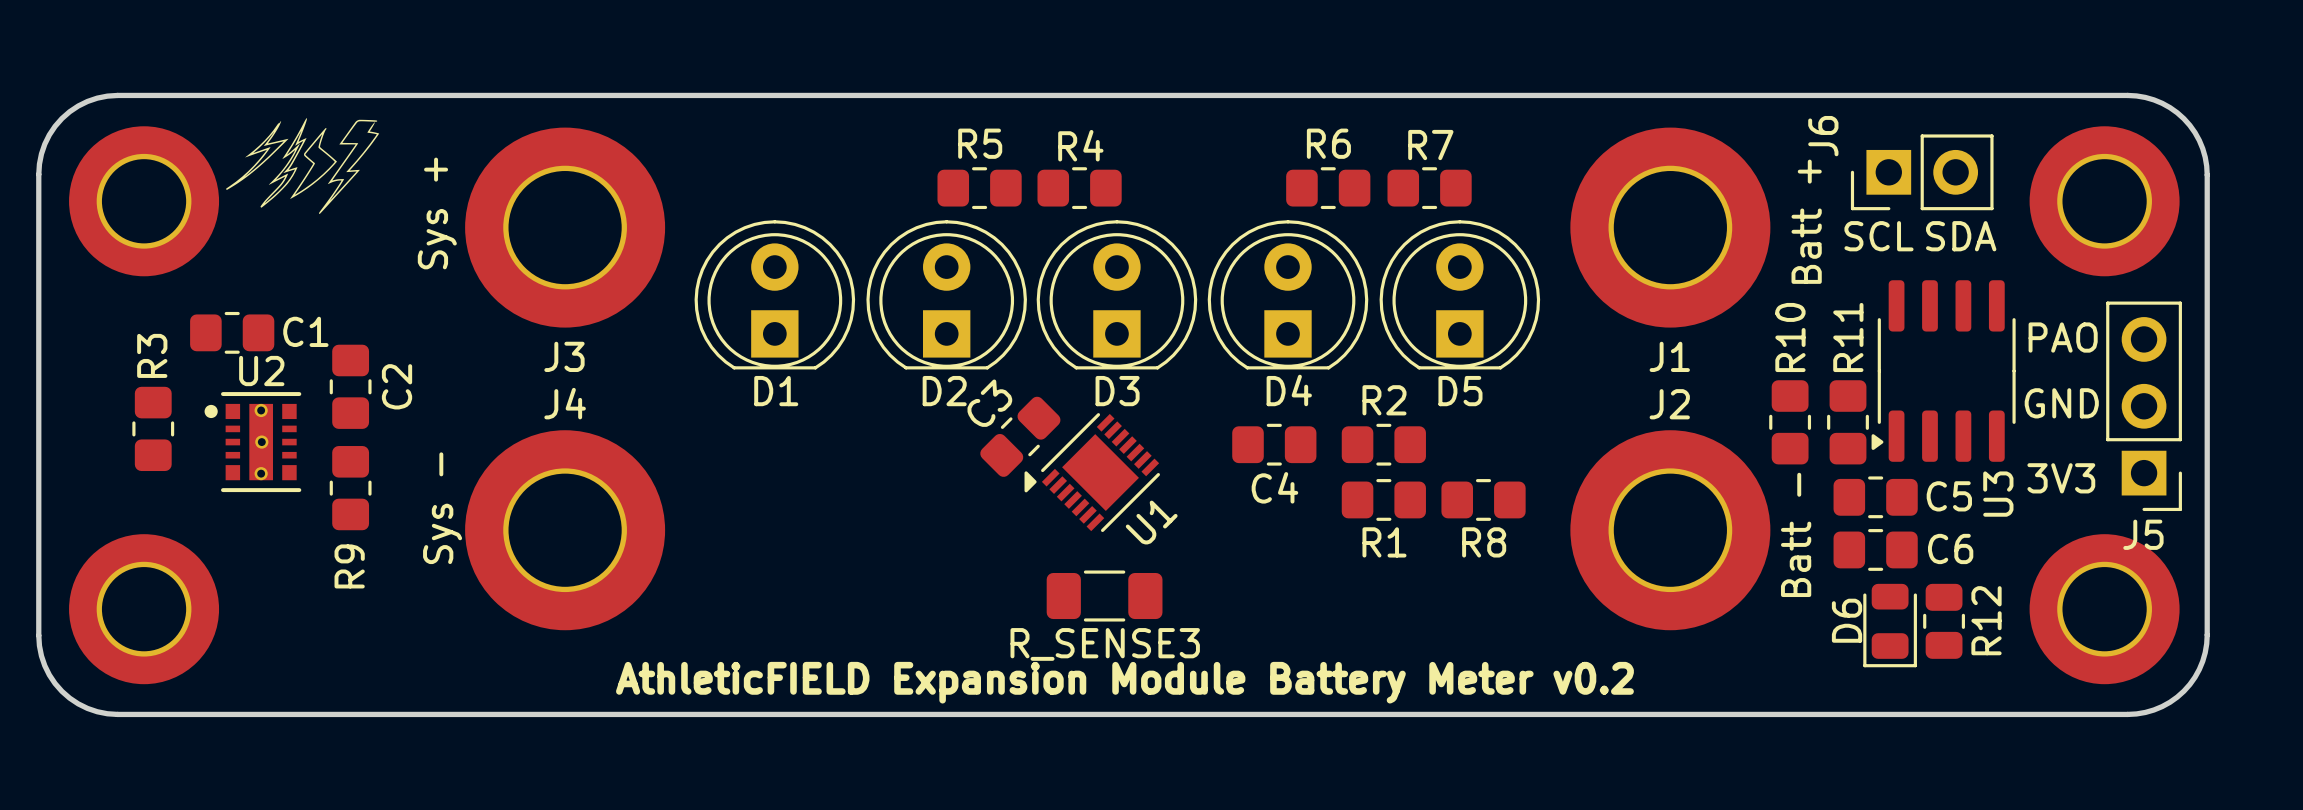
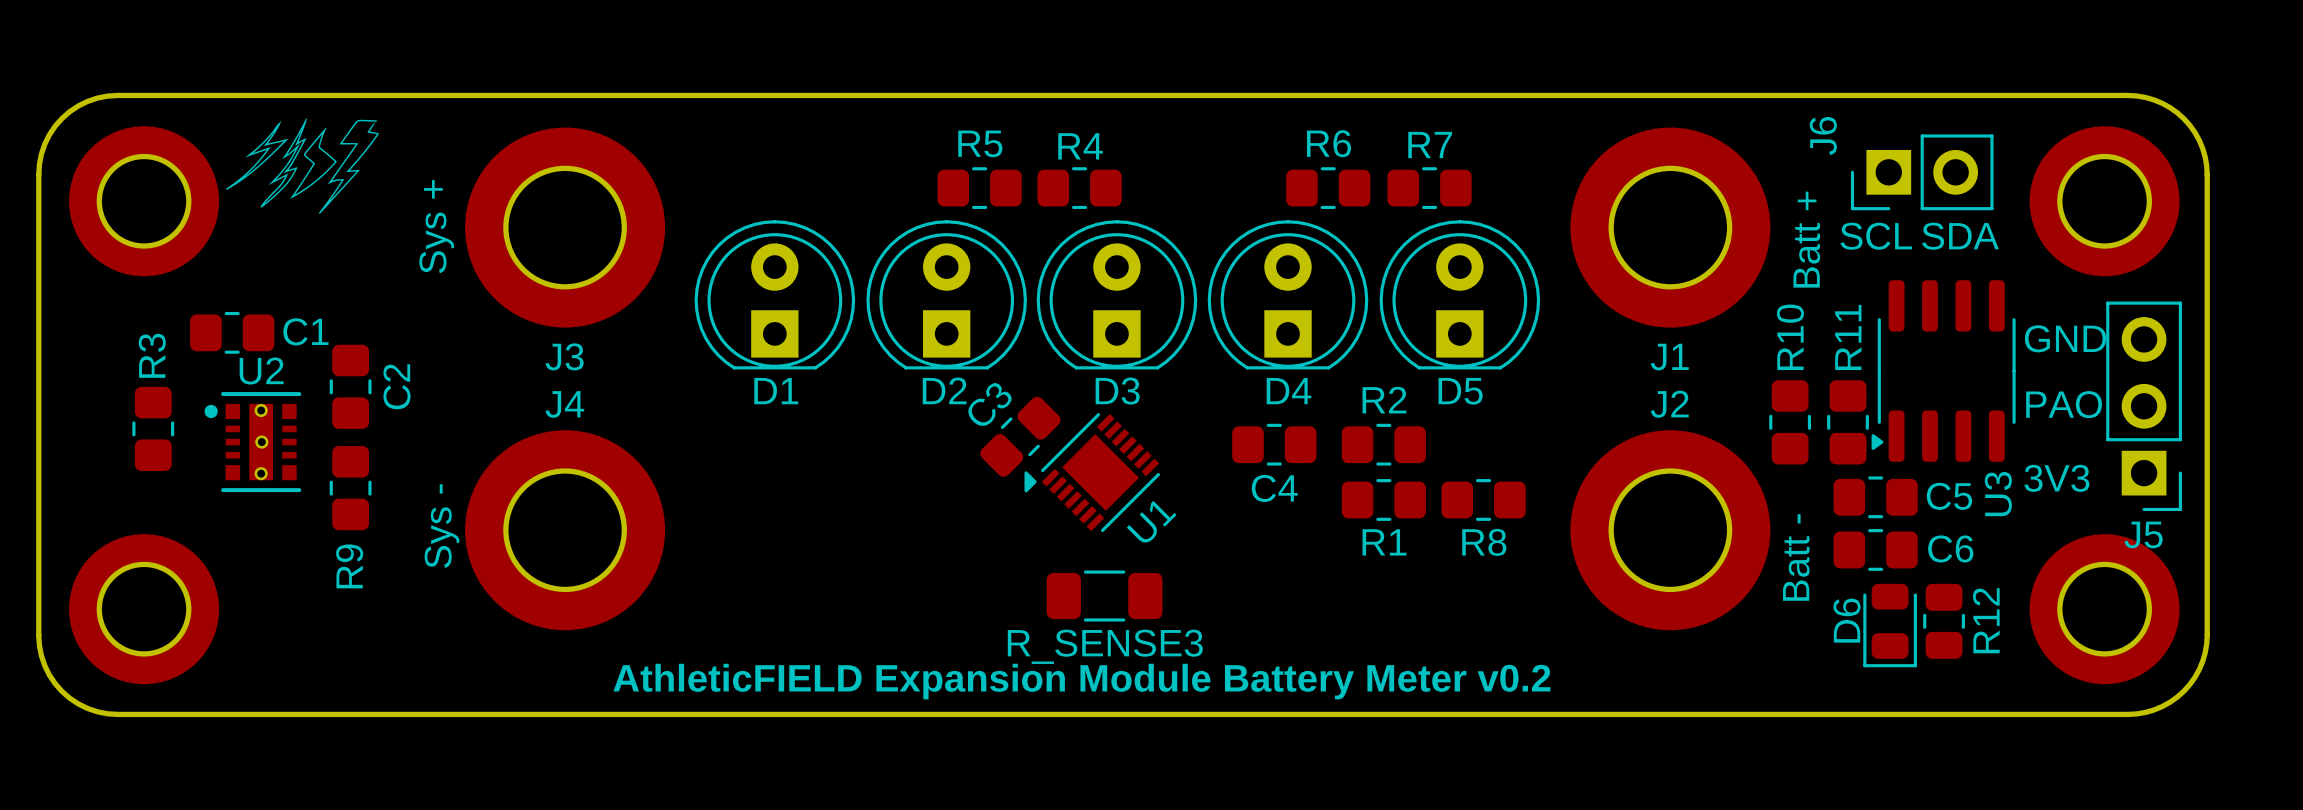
text: PAO (2063, 337) -> GND (2065, 338)
text: GND (2061, 403) -> PAO (2064, 404)

